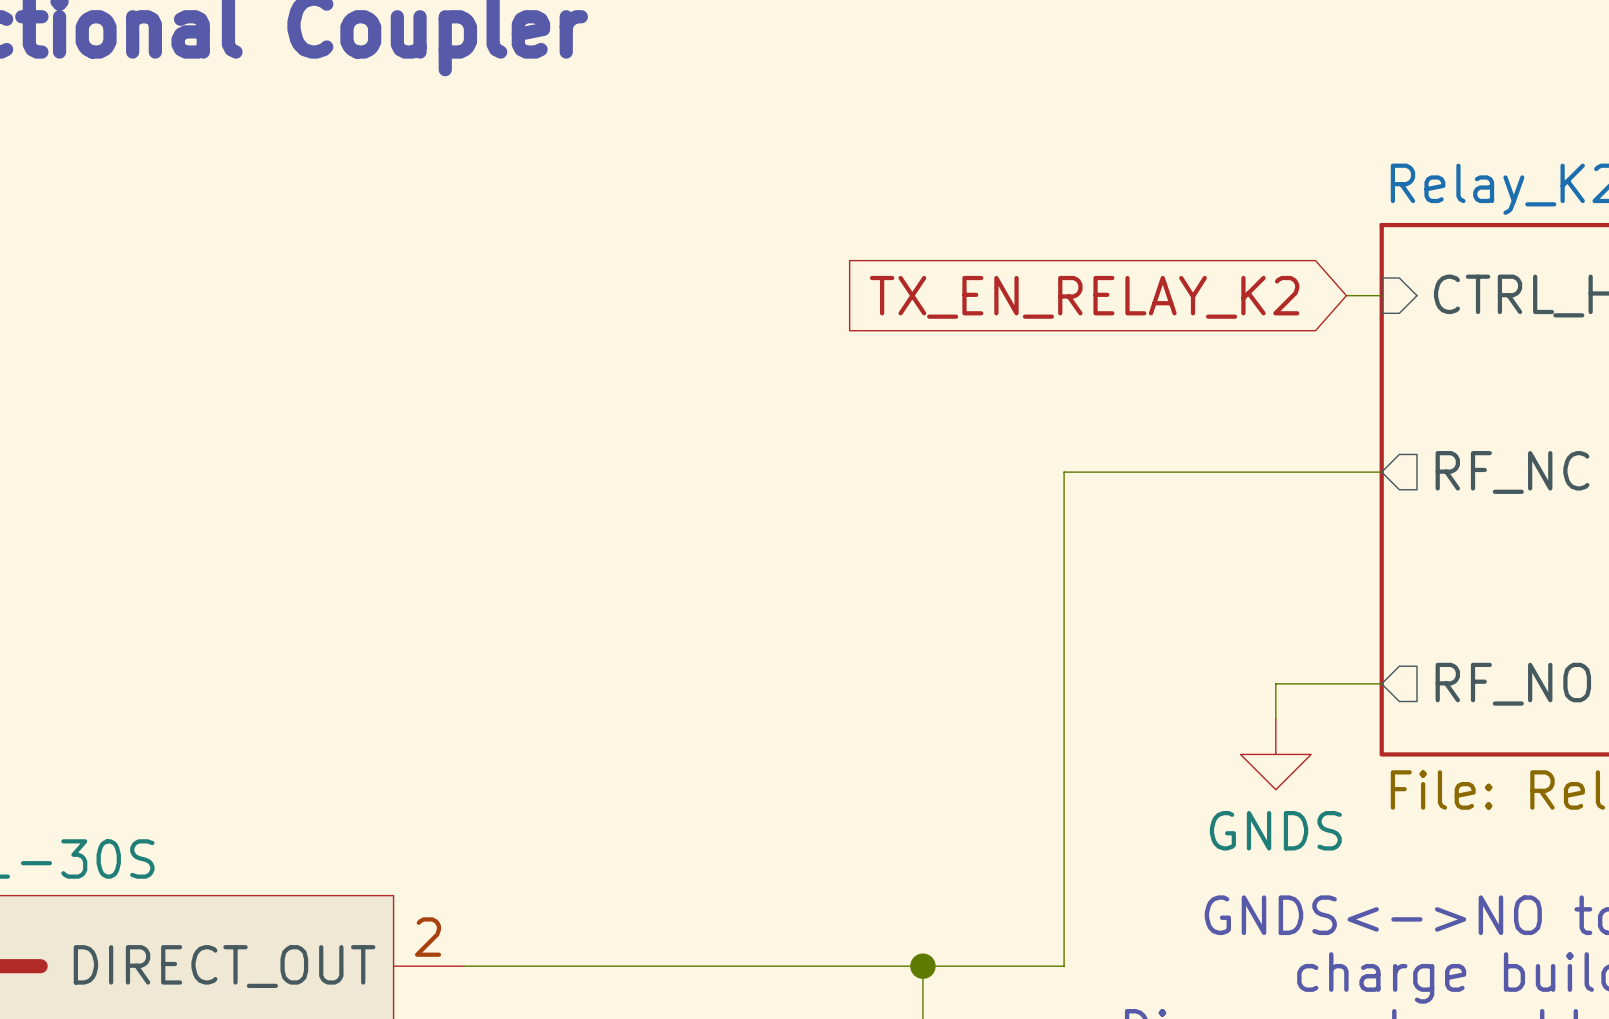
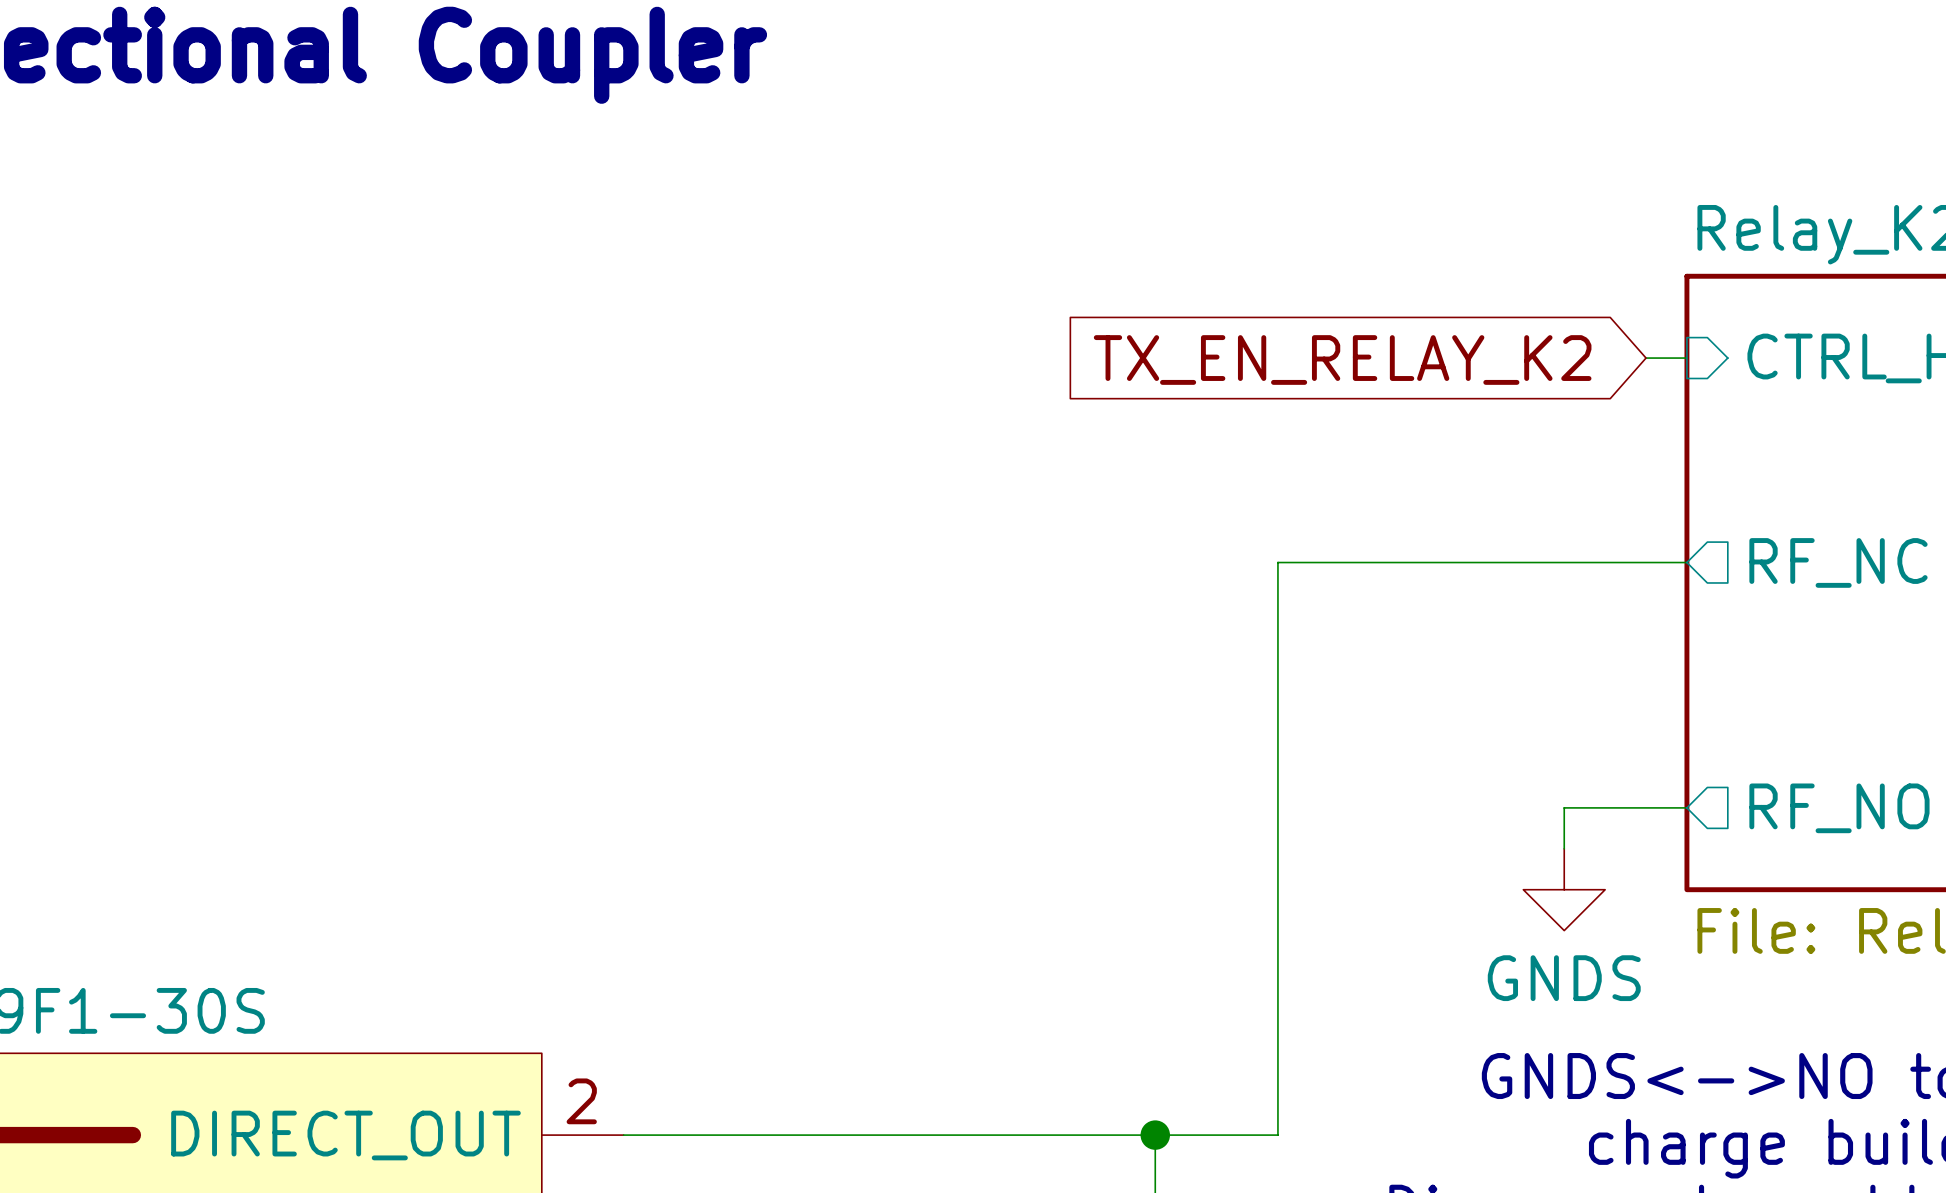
wire: (1064, 472) (1064, 966) (1028, 966) -> (1318, 562) (1277, 562) (1277, 1135)

